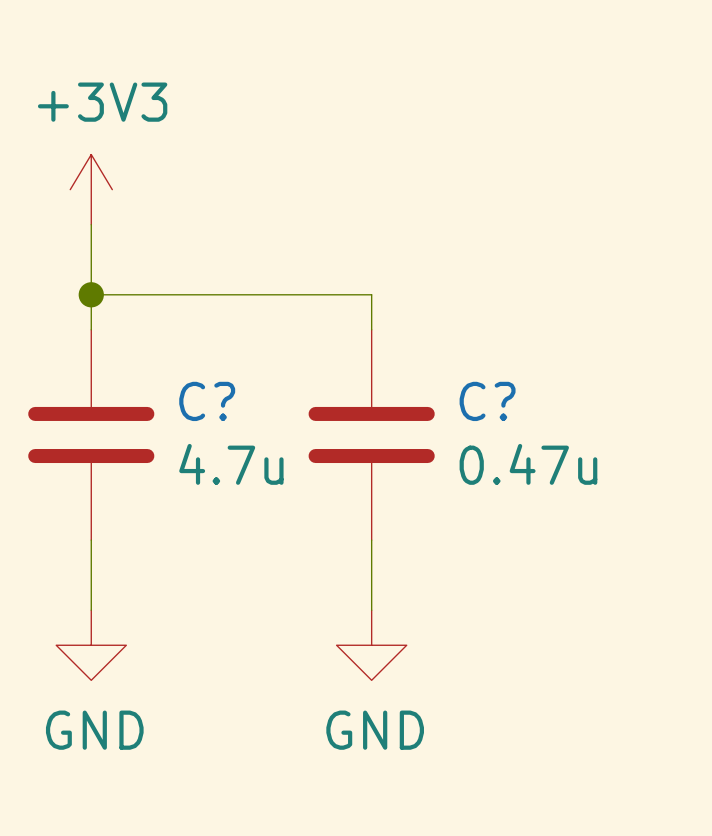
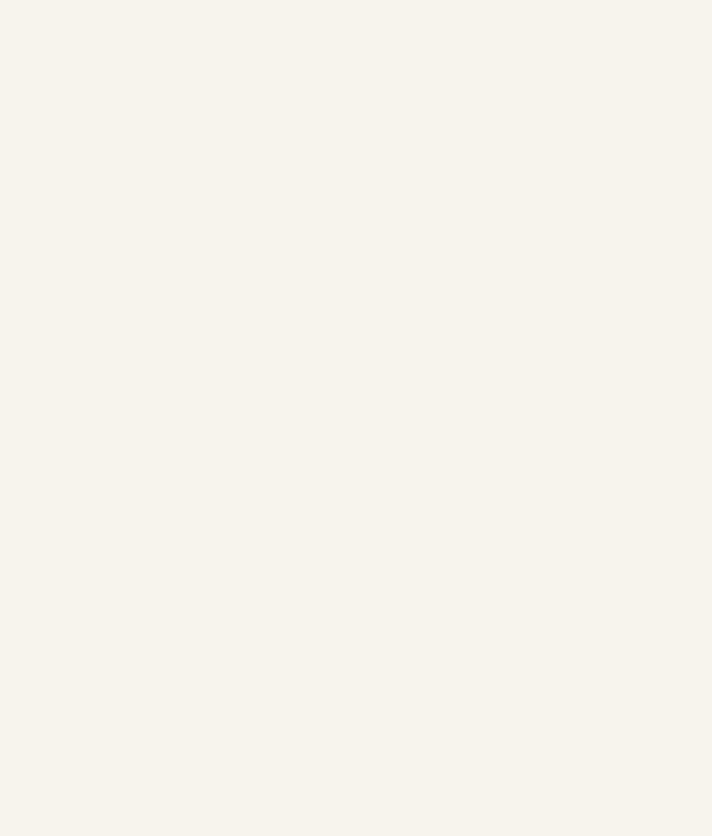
power symbol: +3V3 (91, 189) -> none
wire: (91, 224) (91, 329) -> none
wire: (91, 294) (371, 294) (371, 329) -> none
junction: (91, 294) -> none
C?: 4.7u (91, 434) -> none
C?: 0.47u (371, 434) -> none
wire: (91, 540) (91, 610) -> none
wire: (371, 540) (371, 610) -> none
power symbol: GND (91, 645) -> none
power symbol: GND (371, 645) -> none

